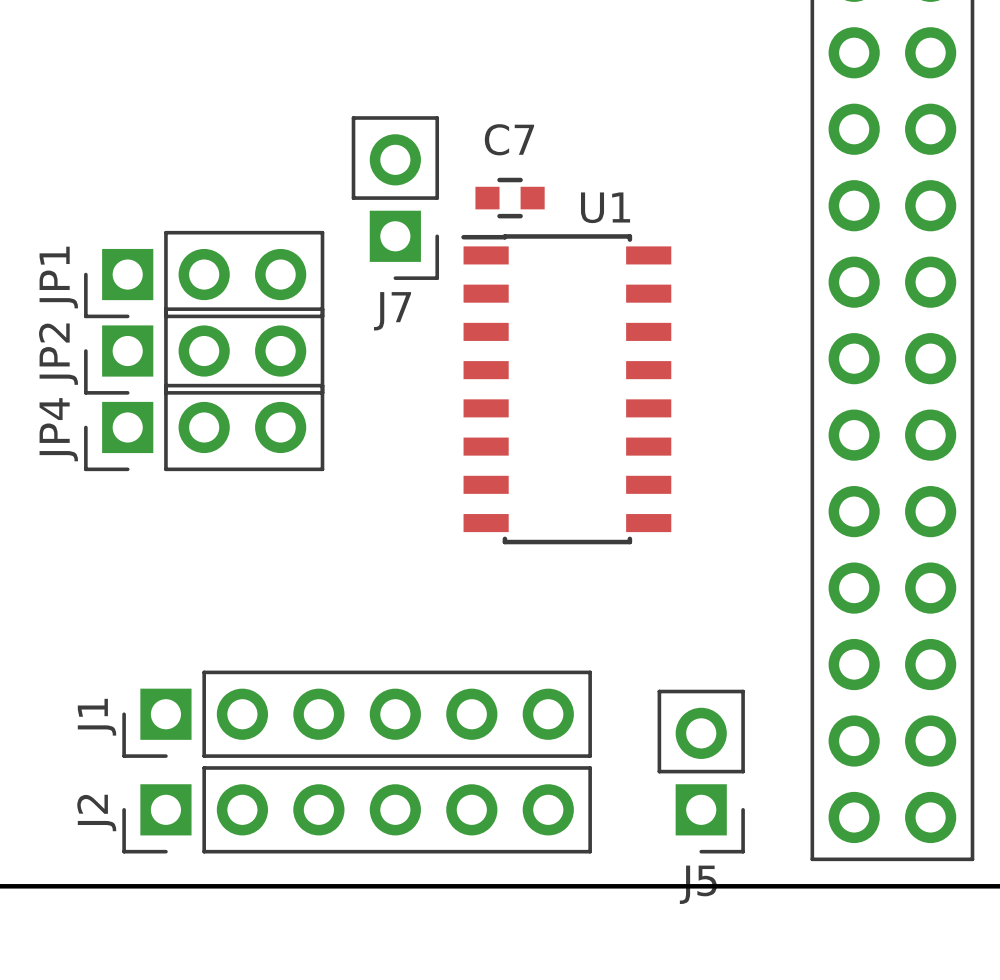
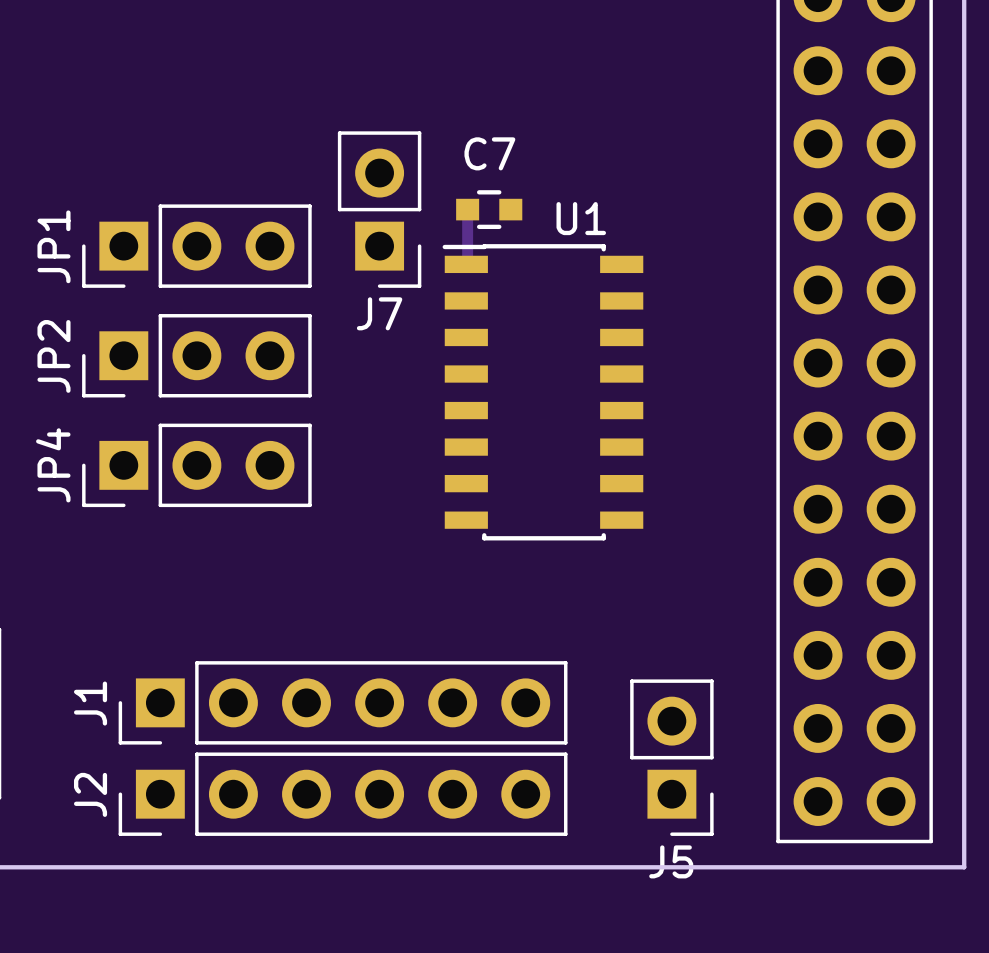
track: none -> (467, 209) (466, 264)
JP1 position: (204, 274) -> (196, 246)
JP4 position: (204, 427) -> (196, 465)

